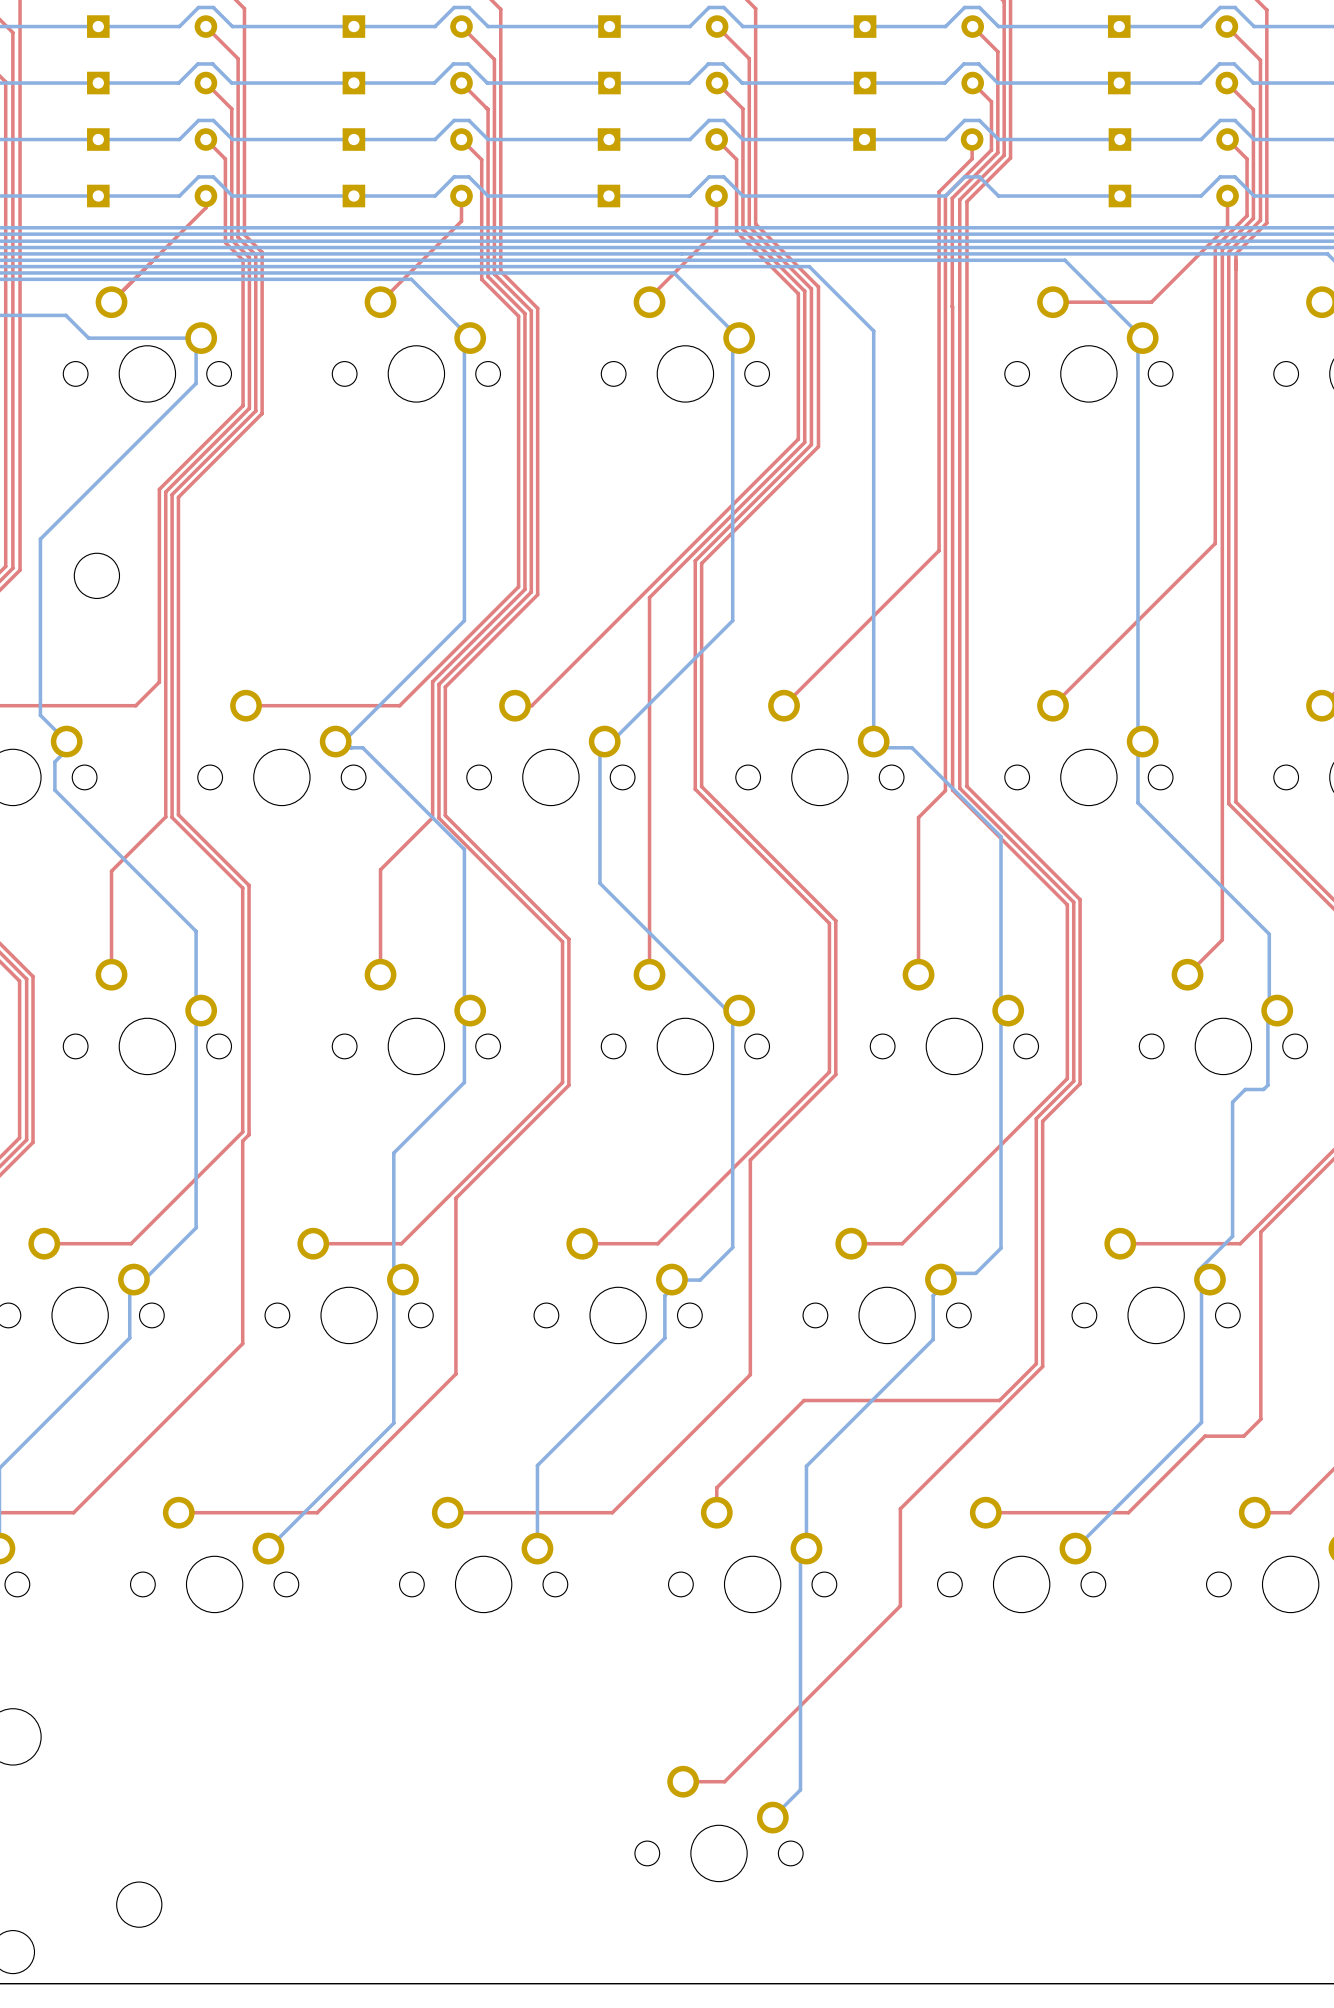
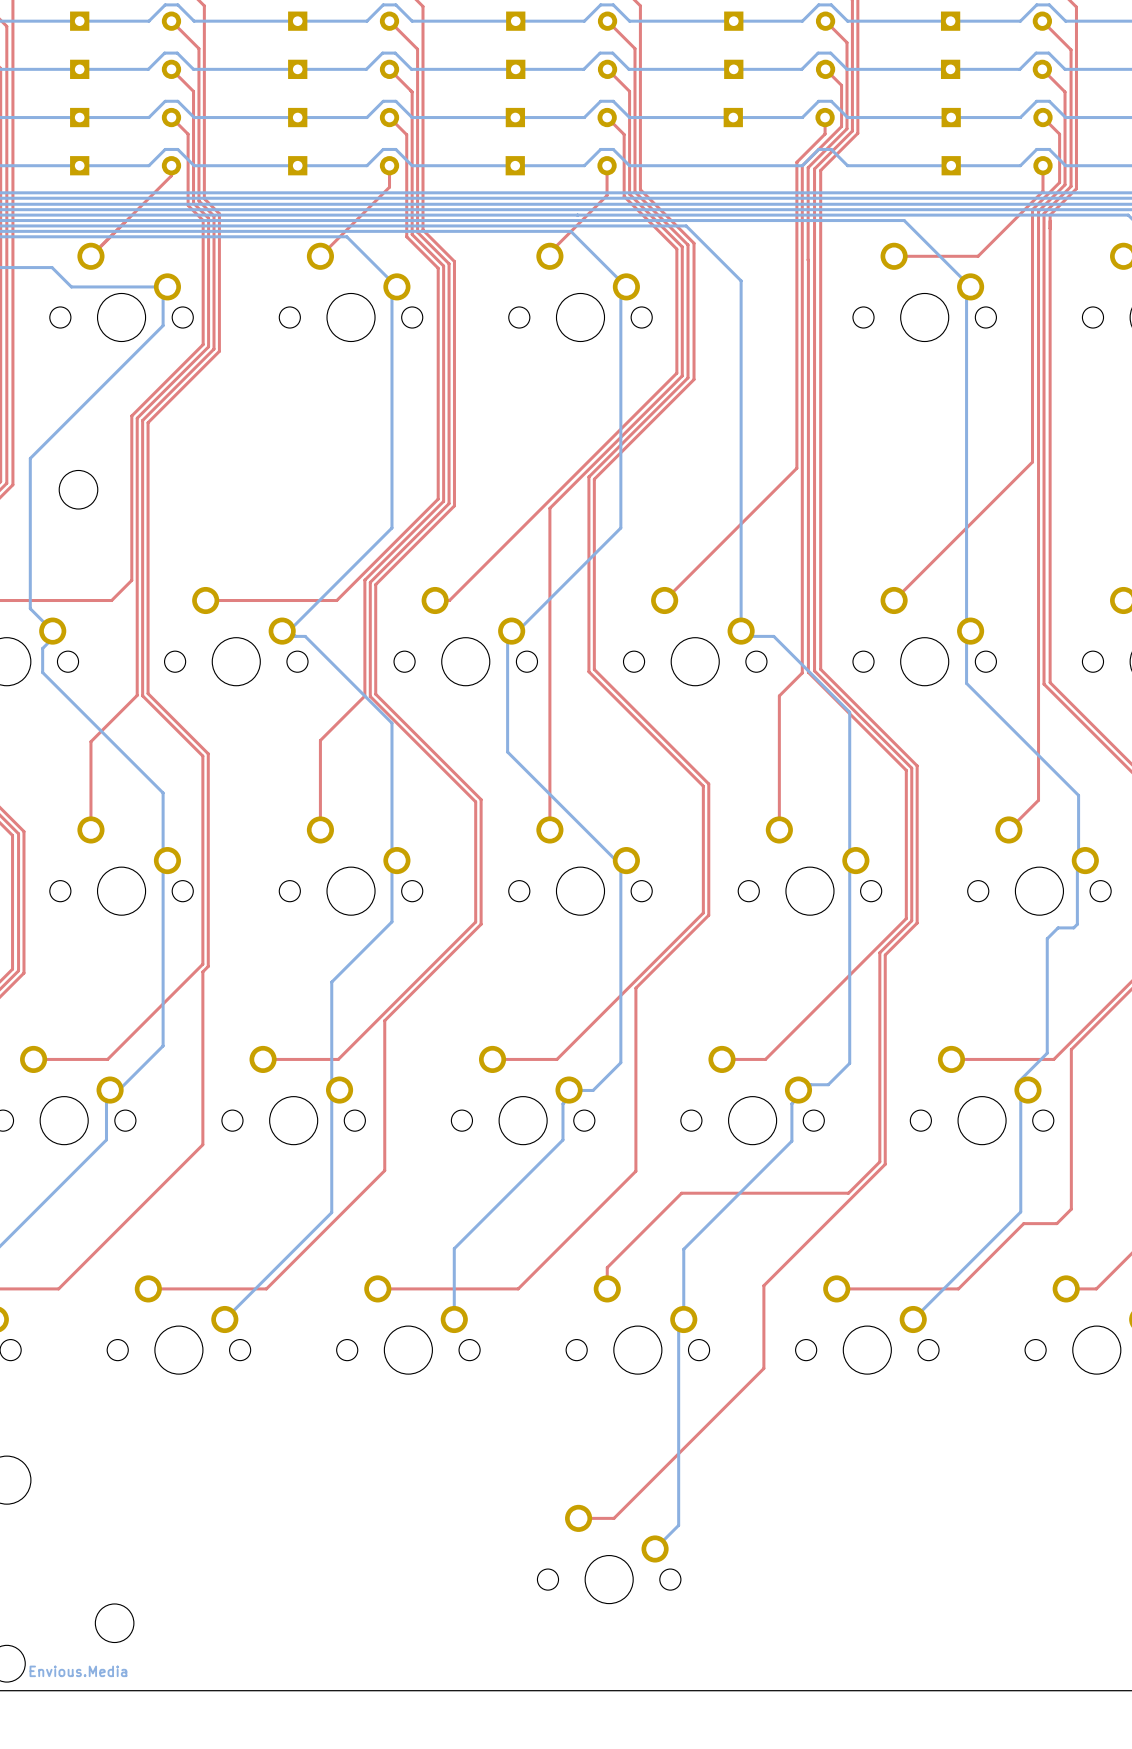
text: none -> Envious.Media (78, 1671)

